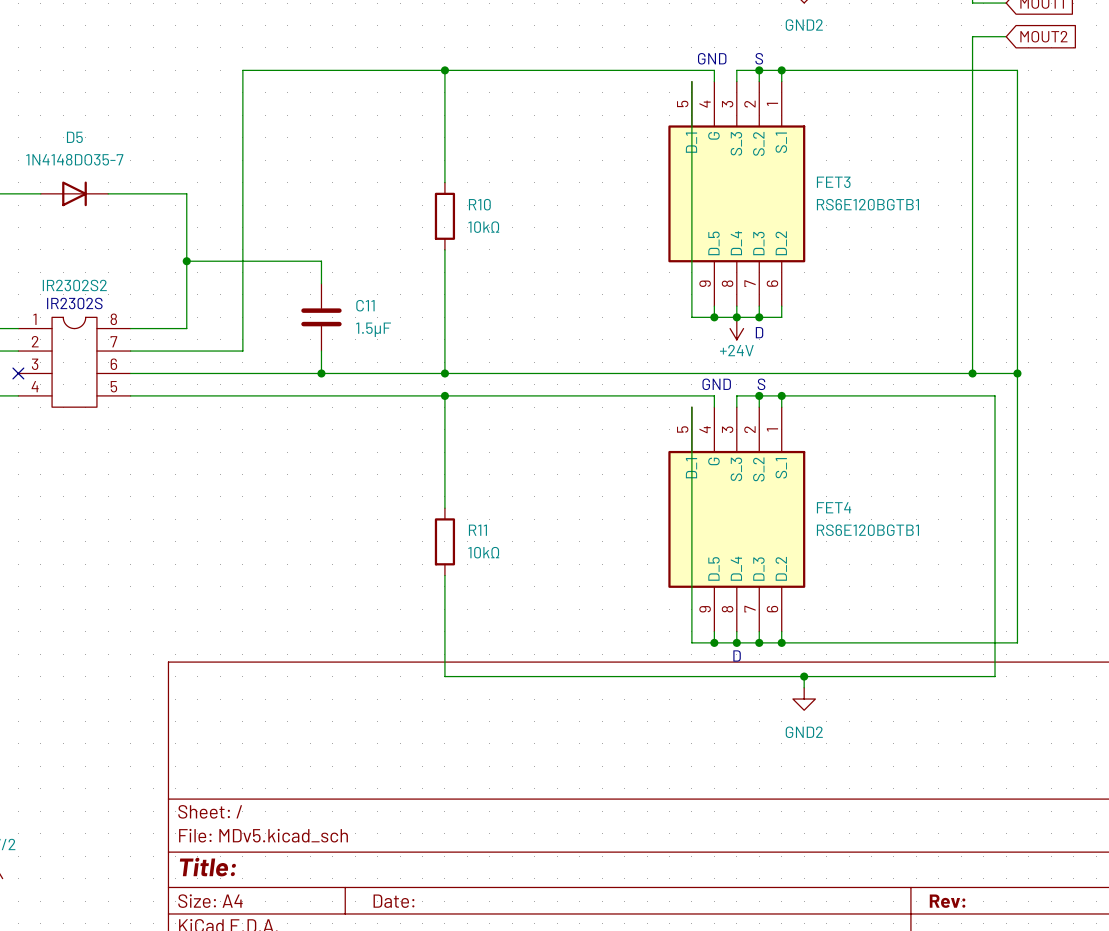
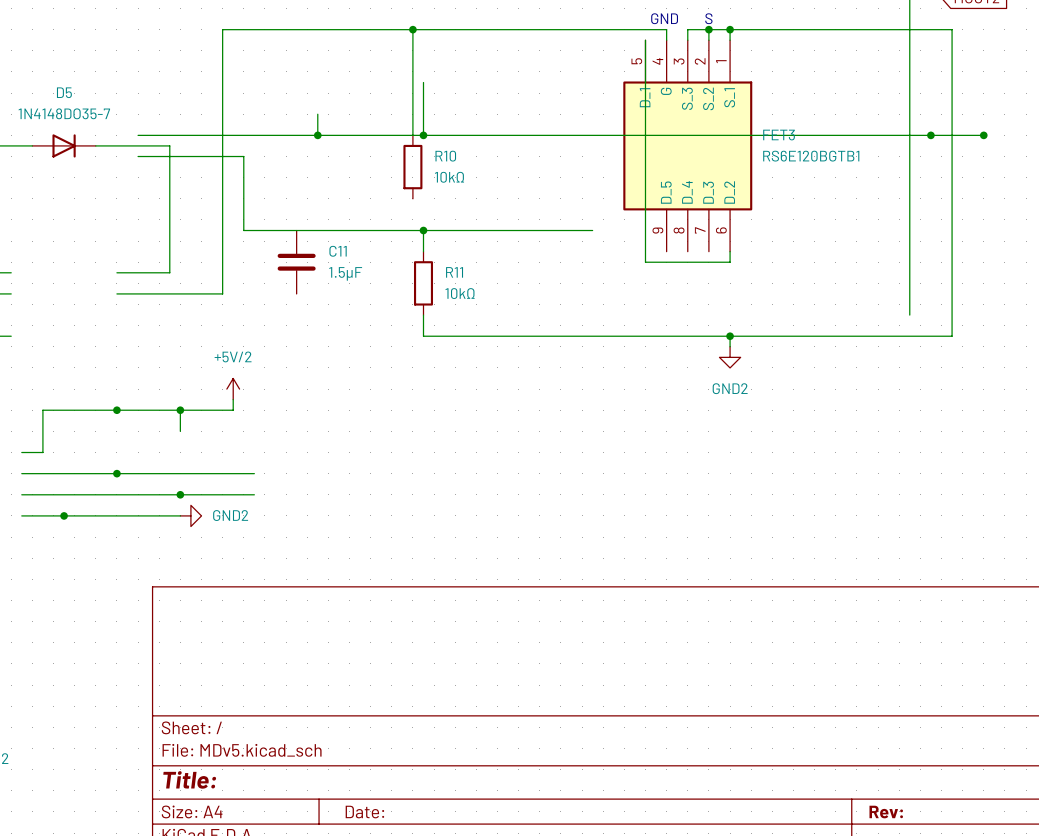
wire: none -> (423, 82) (423, 135)
wire: none -> (317, 114) (317, 135)
wire: none -> (138, 135) (983, 135)
junction: none -> (317, 135)
junction: none -> (423, 135)
junction: none -> (930, 135)
junction: none -> (983, 135)
wire: none -> (138, 156) (243, 156) (243, 230) (592, 230)
wire: (444, 249) (444, 373) -> none
wire: (186, 261) (321, 261) (321, 283) -> none
junction: (186, 261) -> none
junction: none -> (423, 230)
text: IR2302S (74, 303) -> none
wire: (714, 306) (714, 317) -> none
wire: (736, 306) (736, 317) -> none
wire: (759, 306) (759, 317) -> none
junction: (714, 317) -> none
junction: (736, 317) -> none
junction: (759, 317) -> none
power symbol: +24V (736, 328) -> none
text: D (759, 332) -> none
wire: (321, 351) (321, 373) -> (423, 230) (423, 251)
IR2302S2: (74, 362) -> none
no-connect mark: (18, 373) -> none
wire: (130, 373) (1017, 373) -> none
junction: (321, 373) -> none
junction: (444, 373) -> none
junction: (972, 373) -> none
junction: (1017, 373) -> none
text: GND (716, 384) -> none
text: S (761, 384) -> none
wire: (130, 395) (456, 395) -> (423, 315) (423, 336)
wire: (444, 395) (444, 508) -> none
junction: (444, 395) -> none
wire: (714, 395) (714, 407) -> (666, 336) (687, 336)
wire: (736, 395) (736, 407) -> none
wire: (759, 395) (759, 407) -> none
junction: (759, 395) -> none
wire: (995, 395) (995, 676) (444, 676) (444, 575) -> none
wire: (1017, 395) (1017, 642) (691, 642) (691, 407) -> (952, 336) (930, 336)
power symbol: none -> GND2 (730, 357)
power symbol: none -> +5V/2 (233, 389)
wire: none -> (233, 399) (233, 410) (42, 410) (42, 452) (21, 452)
junction: none -> (116, 410)
wire: none -> (180, 410) (180, 431)
junction: none -> (180, 410)
FET4: RS6E120BGTB1 (736, 519) -> none
wire: none -> (21, 473) (254, 473)
junction: none -> (116, 473)
R11 position: (444, 541) -> (423, 283)
wire: none -> (21, 494) (254, 494)
junction: none -> (180, 494)
wire: none -> (21, 515) (180, 515)
junction: none -> (64, 515)
power symbol: none -> GND2 (190, 515)
wire: (714, 631) (714, 642) -> none
wire: (736, 631) (736, 642) -> none
wire: (759, 631) (759, 642) -> none
wire: (781, 631) (781, 642) -> none
junction: (714, 642) -> none
junction: (736, 642) -> none
junction: (759, 642) -> none
junction: (781, 642) -> none
text: D (737, 655) -> none
wire: (804, 676) (804, 687) -> none
junction: (804, 676) -> none
power symbol: GND2 (804, 699) -> none

